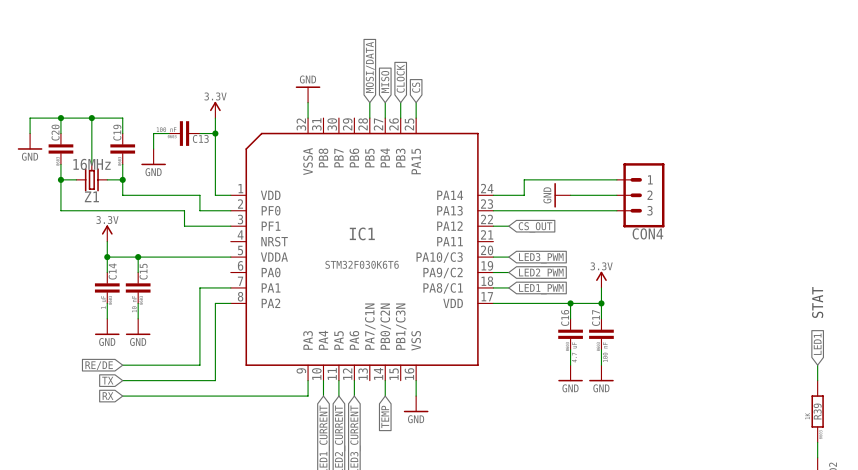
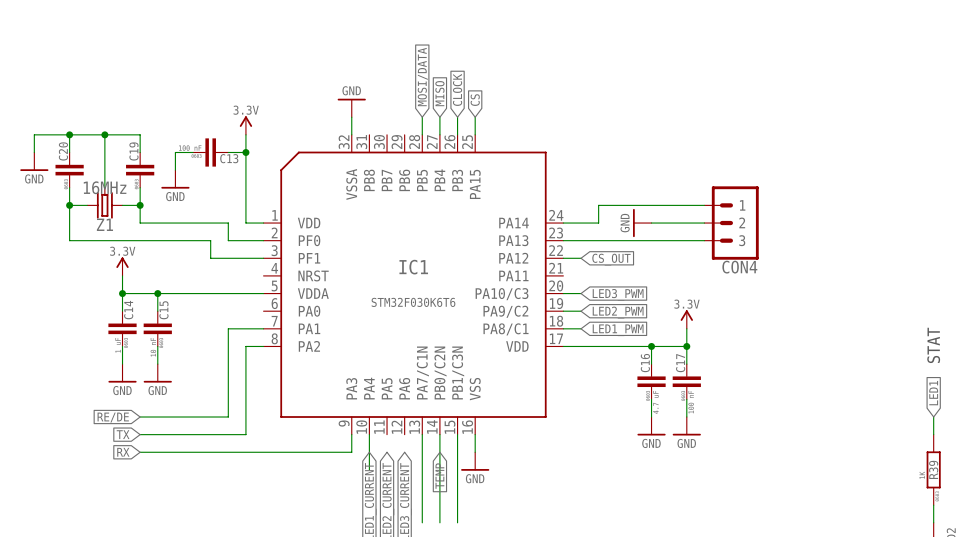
wire: (338, 380) (338, 396) -> (369, 452) (369, 469)
wire: (354, 380) (354, 396) -> none
wire: none -> (422, 434) (422, 522)
wire: none -> (457, 434) (457, 522)
wire: none -> (439, 452) (439, 522)

